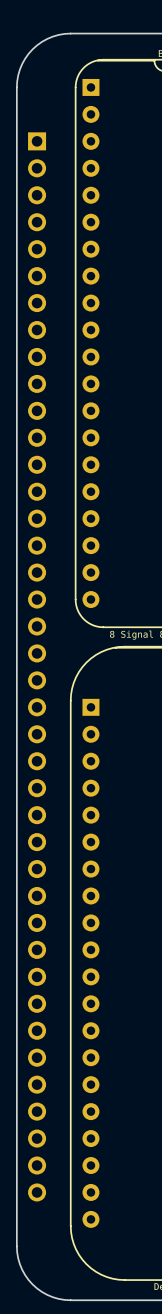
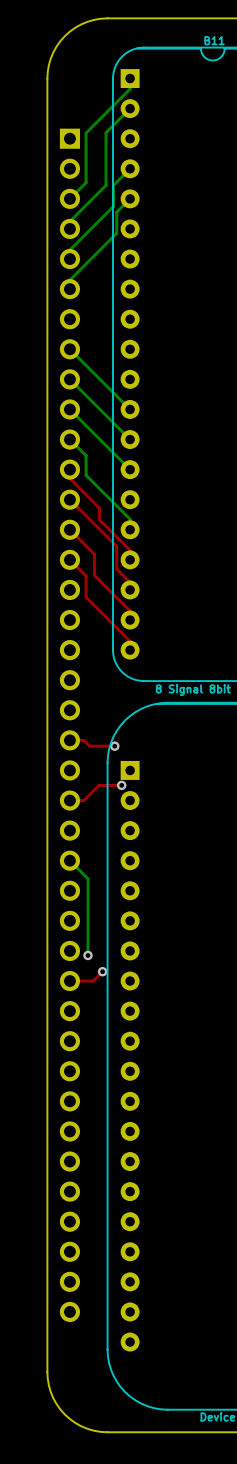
bottom track: none -> (130, 78) (130, 89) (86, 133) (86, 182) (69, 198)
bottom track: none -> (130, 108) (106, 132) (106, 185) (69, 221)
bottom track: none -> (130, 168) (113, 185) (113, 206) (69, 250) (69, 259)
bottom track: none -> (130, 198) (116, 212) (116, 233) (69, 280) (69, 289)
bottom track: none -> (69, 349) (130, 409)
bottom track: none -> (69, 379) (130, 439)
bottom track: none -> (69, 409) (130, 469)
bottom track: none -> (69, 439) (86, 455) (86, 475) (130, 519) (130, 529)
top track: none -> (69, 469) (69, 478) (99, 508) (99, 519) (130, 550) (130, 559)
top track: none -> (69, 499) (116, 546) (116, 569) (130, 582)
top track: none -> (69, 529) (94, 554) (94, 575) (130, 611) (130, 620)
top track: none -> (69, 559) (86, 576) (86, 597) (130, 641) (130, 650)
top track: none -> (69, 740) (83, 740) (89, 746) (114, 746)
via: none -> (114, 746)
top track: none -> (121, 785) (99, 785) (83, 800) (69, 800)
via: none -> (121, 785)
bottom track: none -> (69, 860) (87, 878) (87, 955)
via: none -> (87, 955)
top track: none -> (102, 971) (93, 981) (69, 981)
via: none -> (102, 971)

